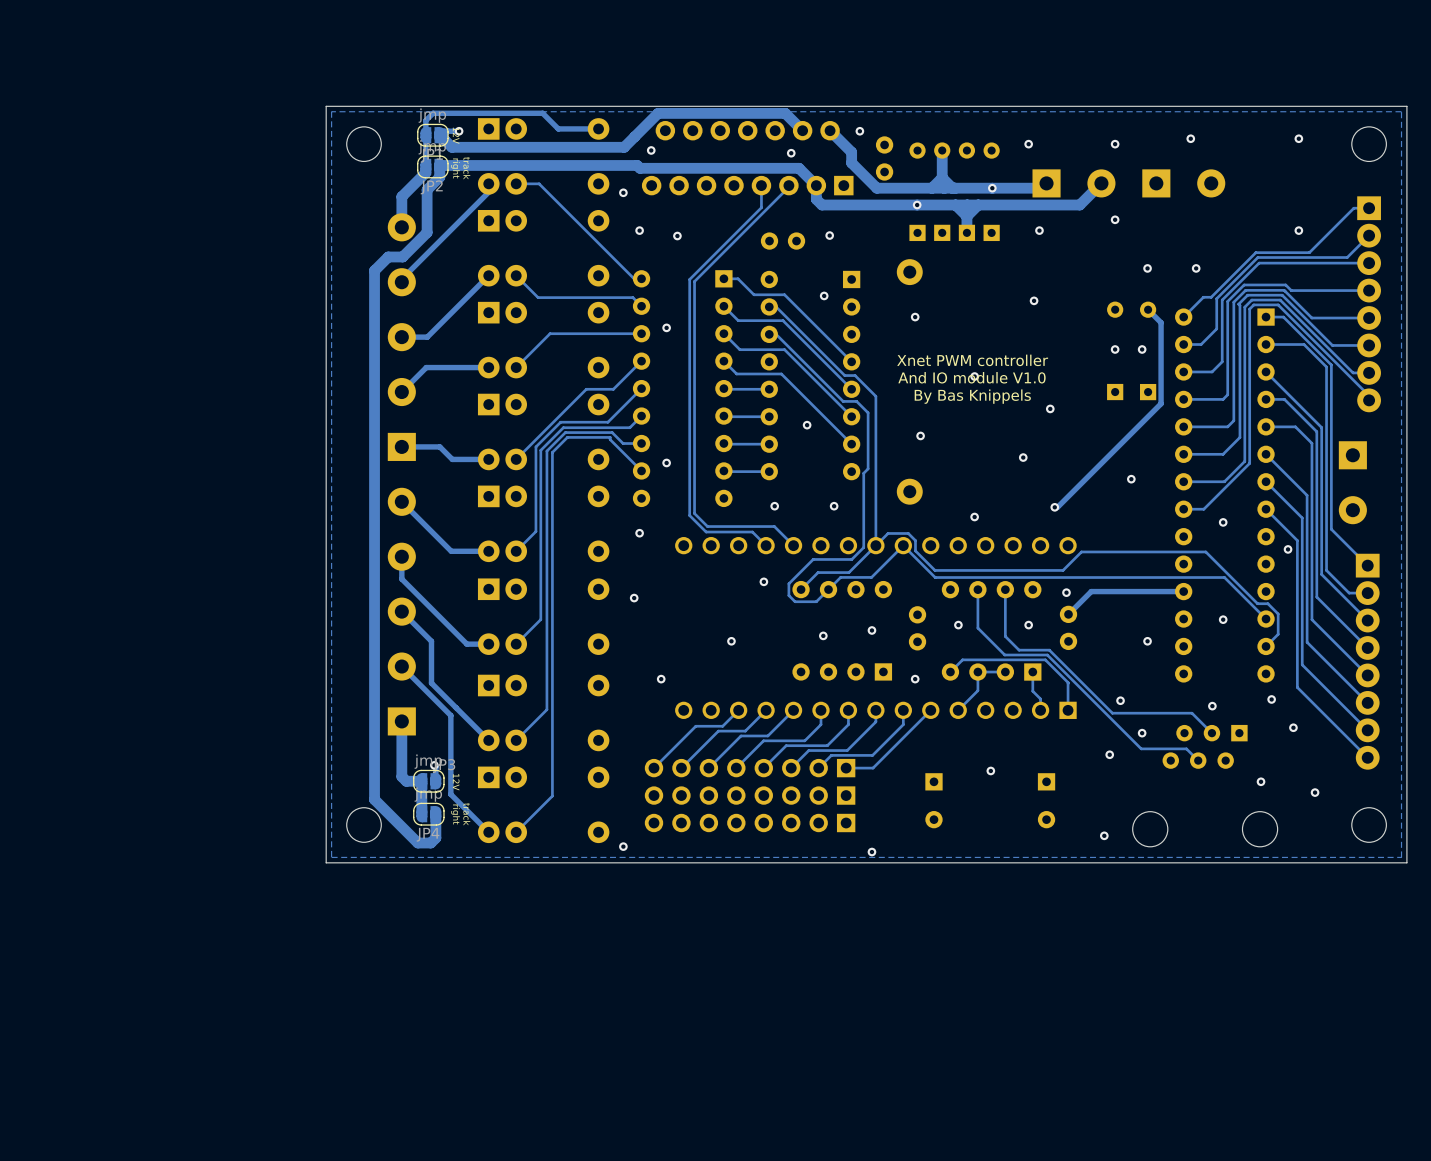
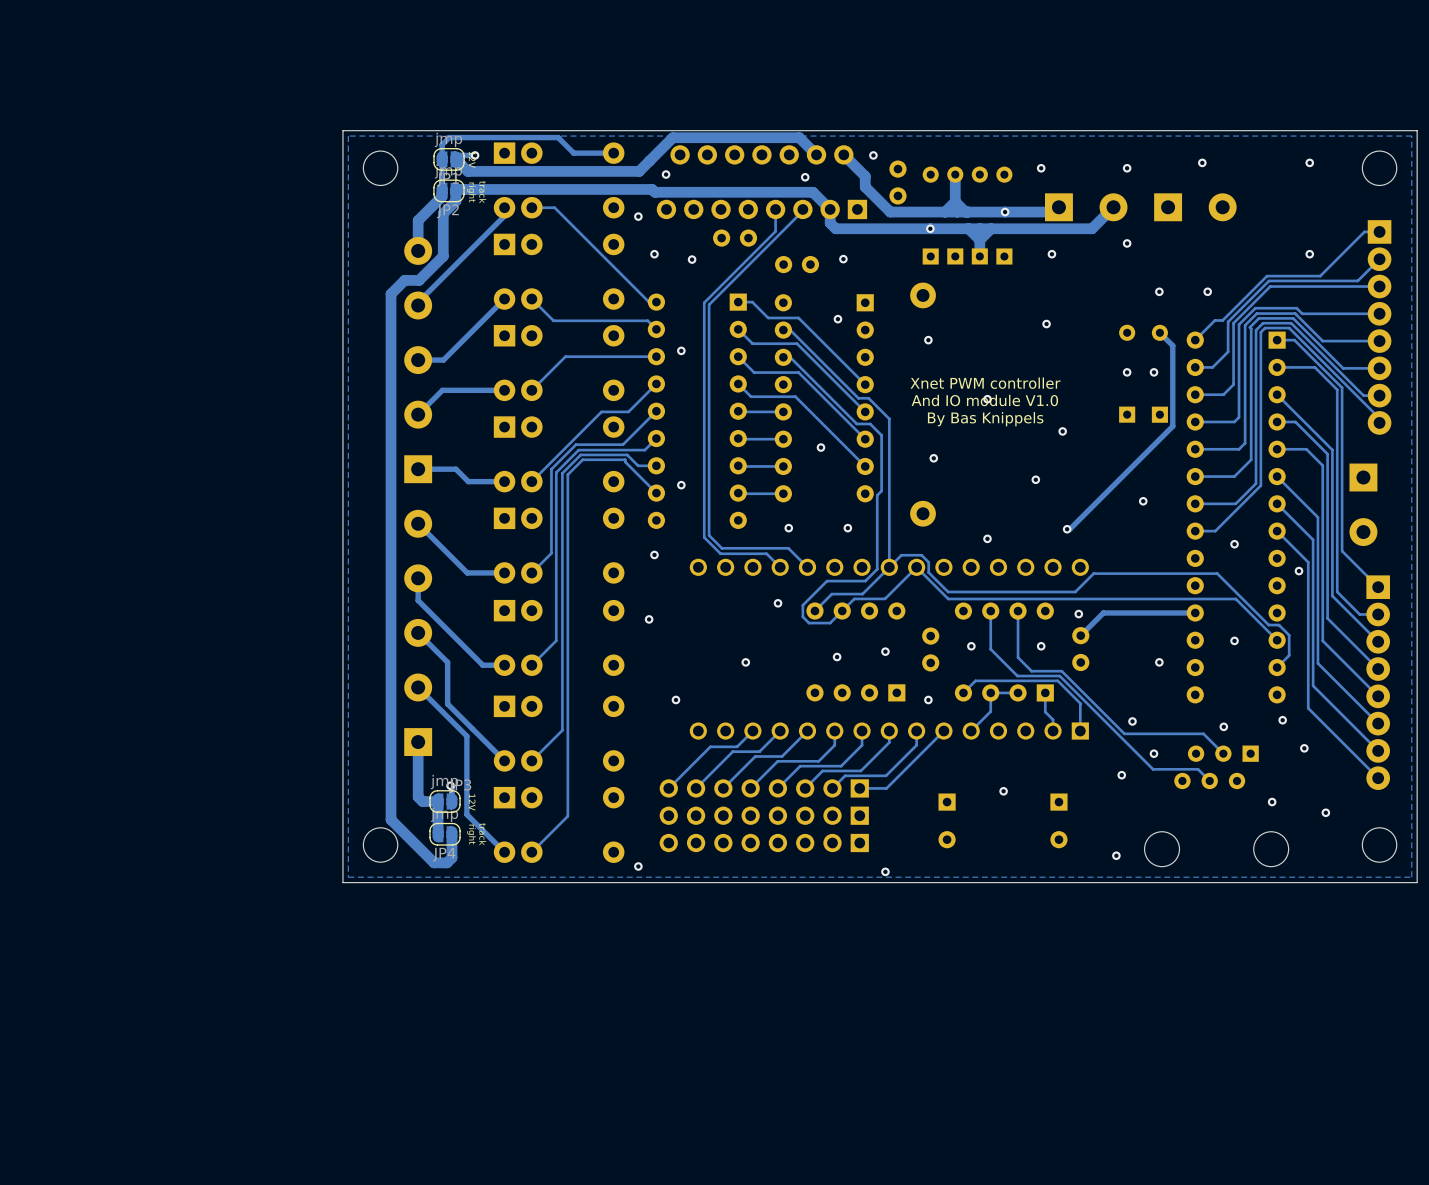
part: none -> (735, 238)

